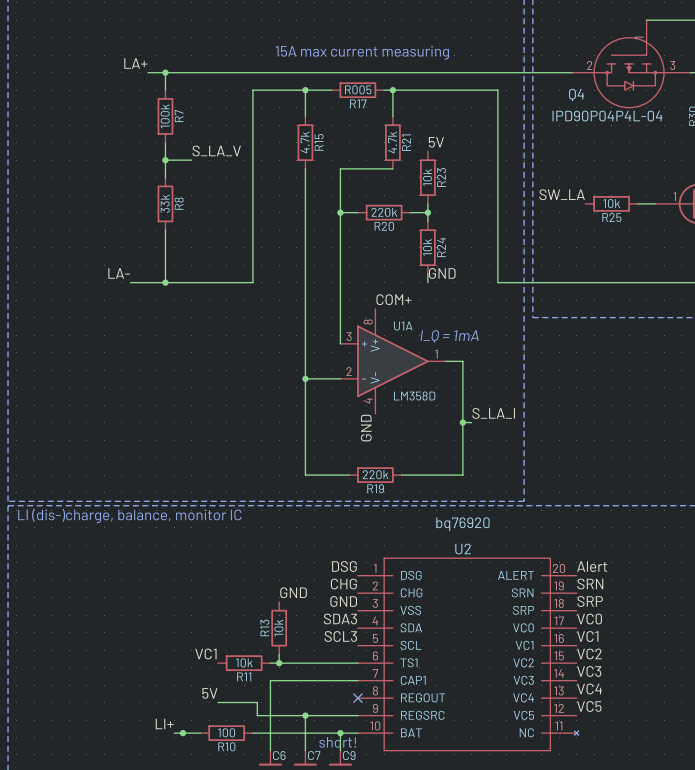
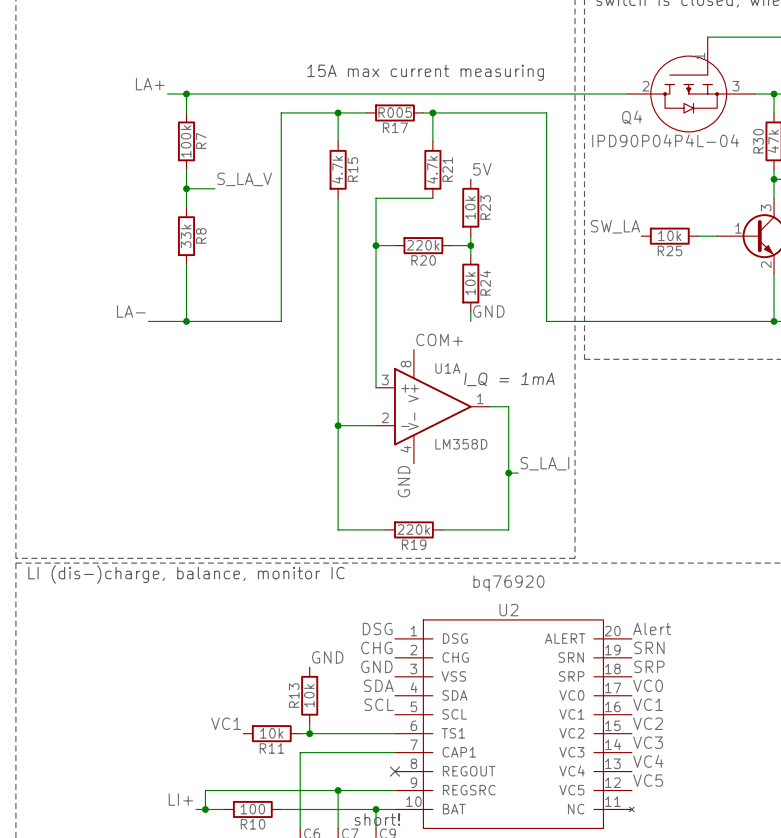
label: SDA3 (340, 619) -> SDA (378, 685)
label: SCL3 (340, 636) -> SCL (379, 704)
label: 5V (209, 693) -> none
wire: (217, 702) (257, 702) (257, 715) -> (205, 809) (205, 790) (285, 790)

